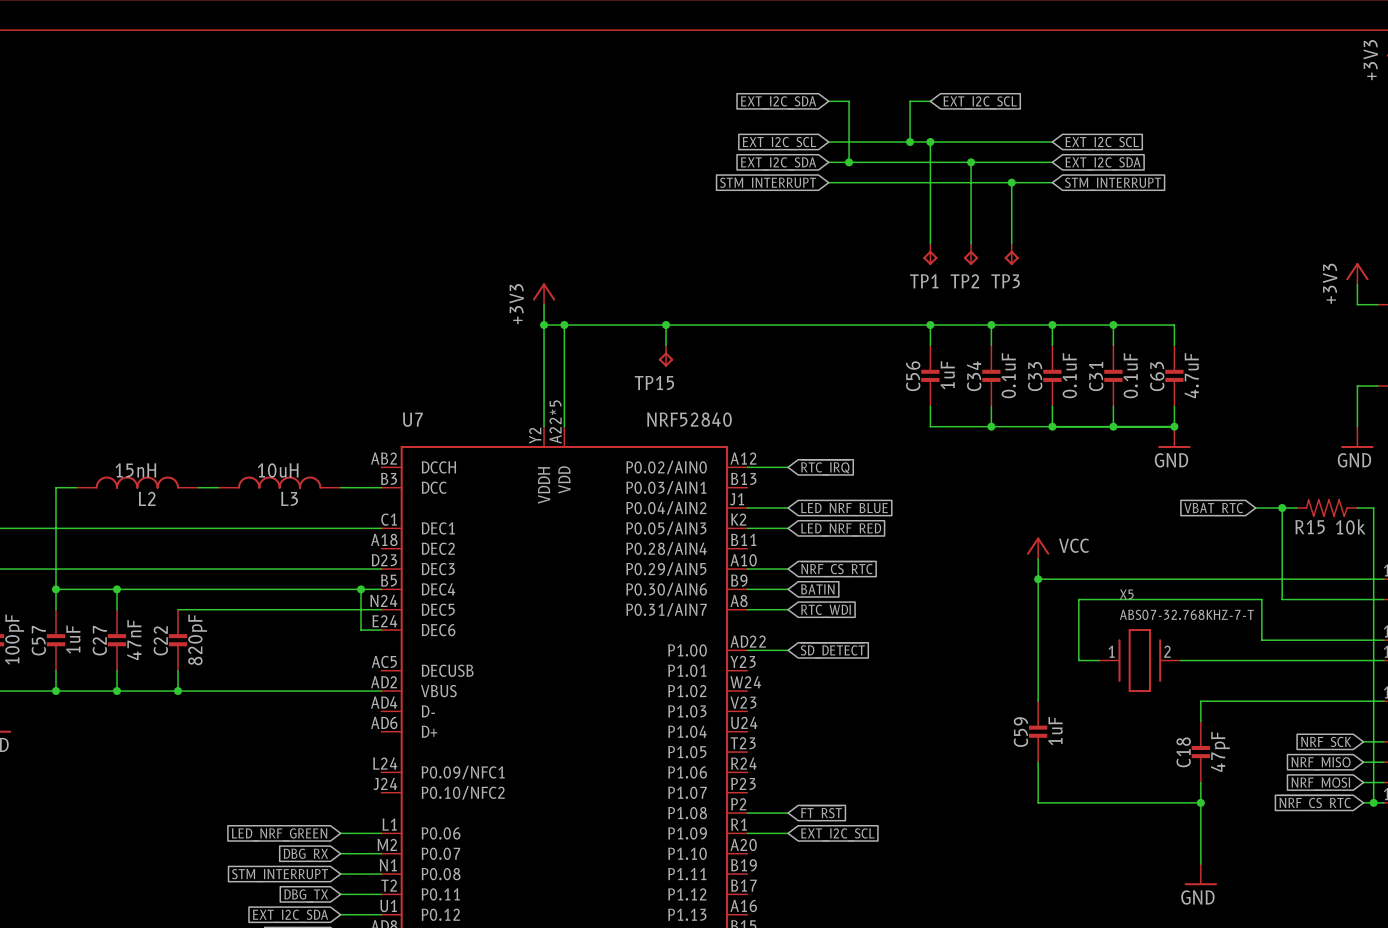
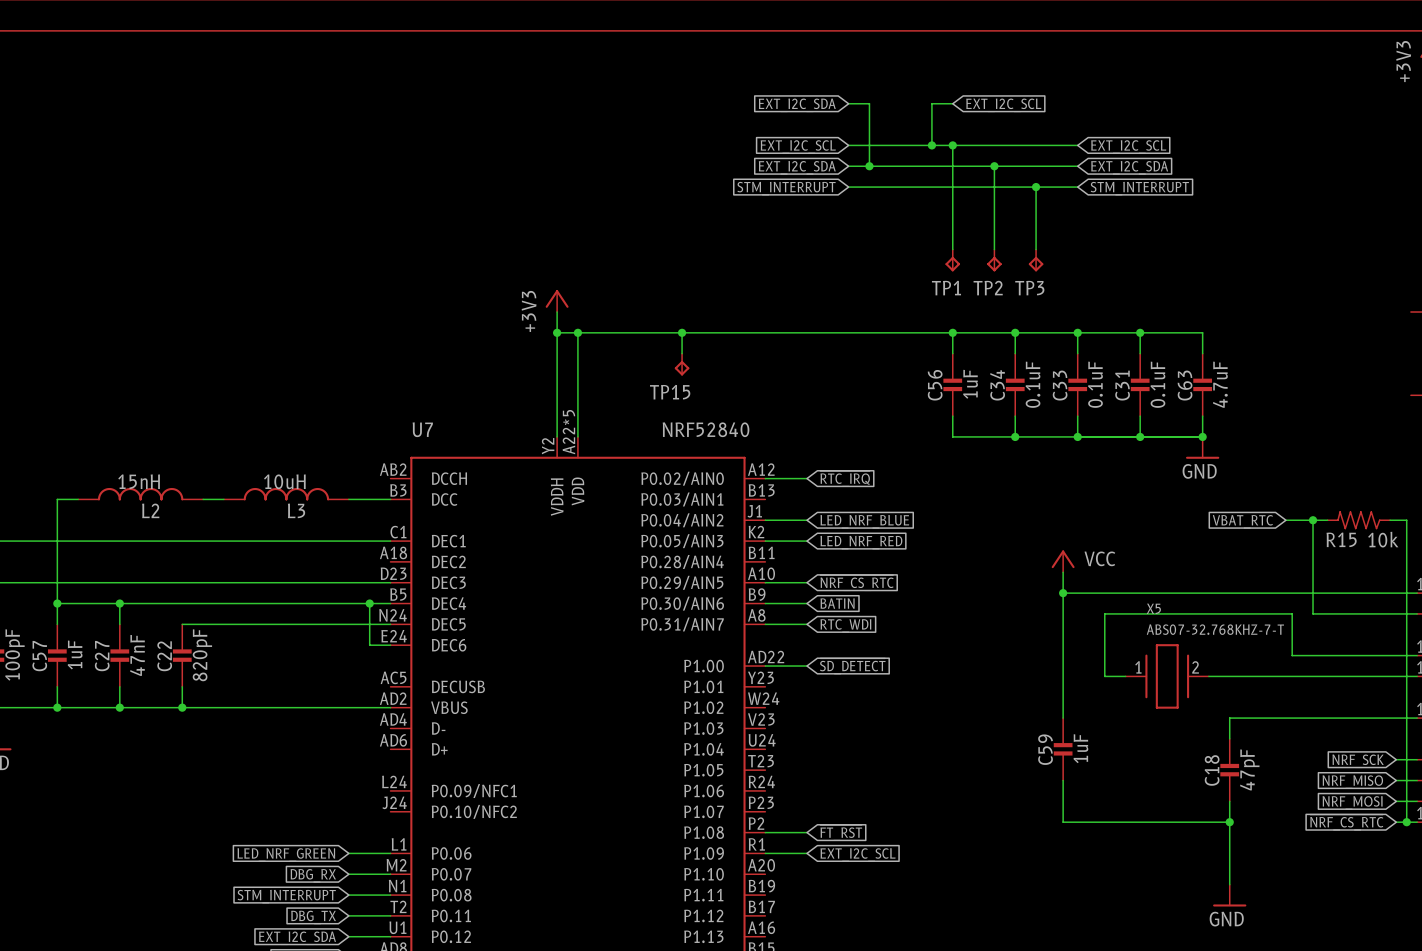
power symbol: +3V3 (1357, 273) -> none
wire: (1357, 284) (1357, 304) (1377, 304) -> none
wire: (1377, 386) (1357, 386) (1357, 426) -> none
power symbol: GND (1357, 437) -> none

